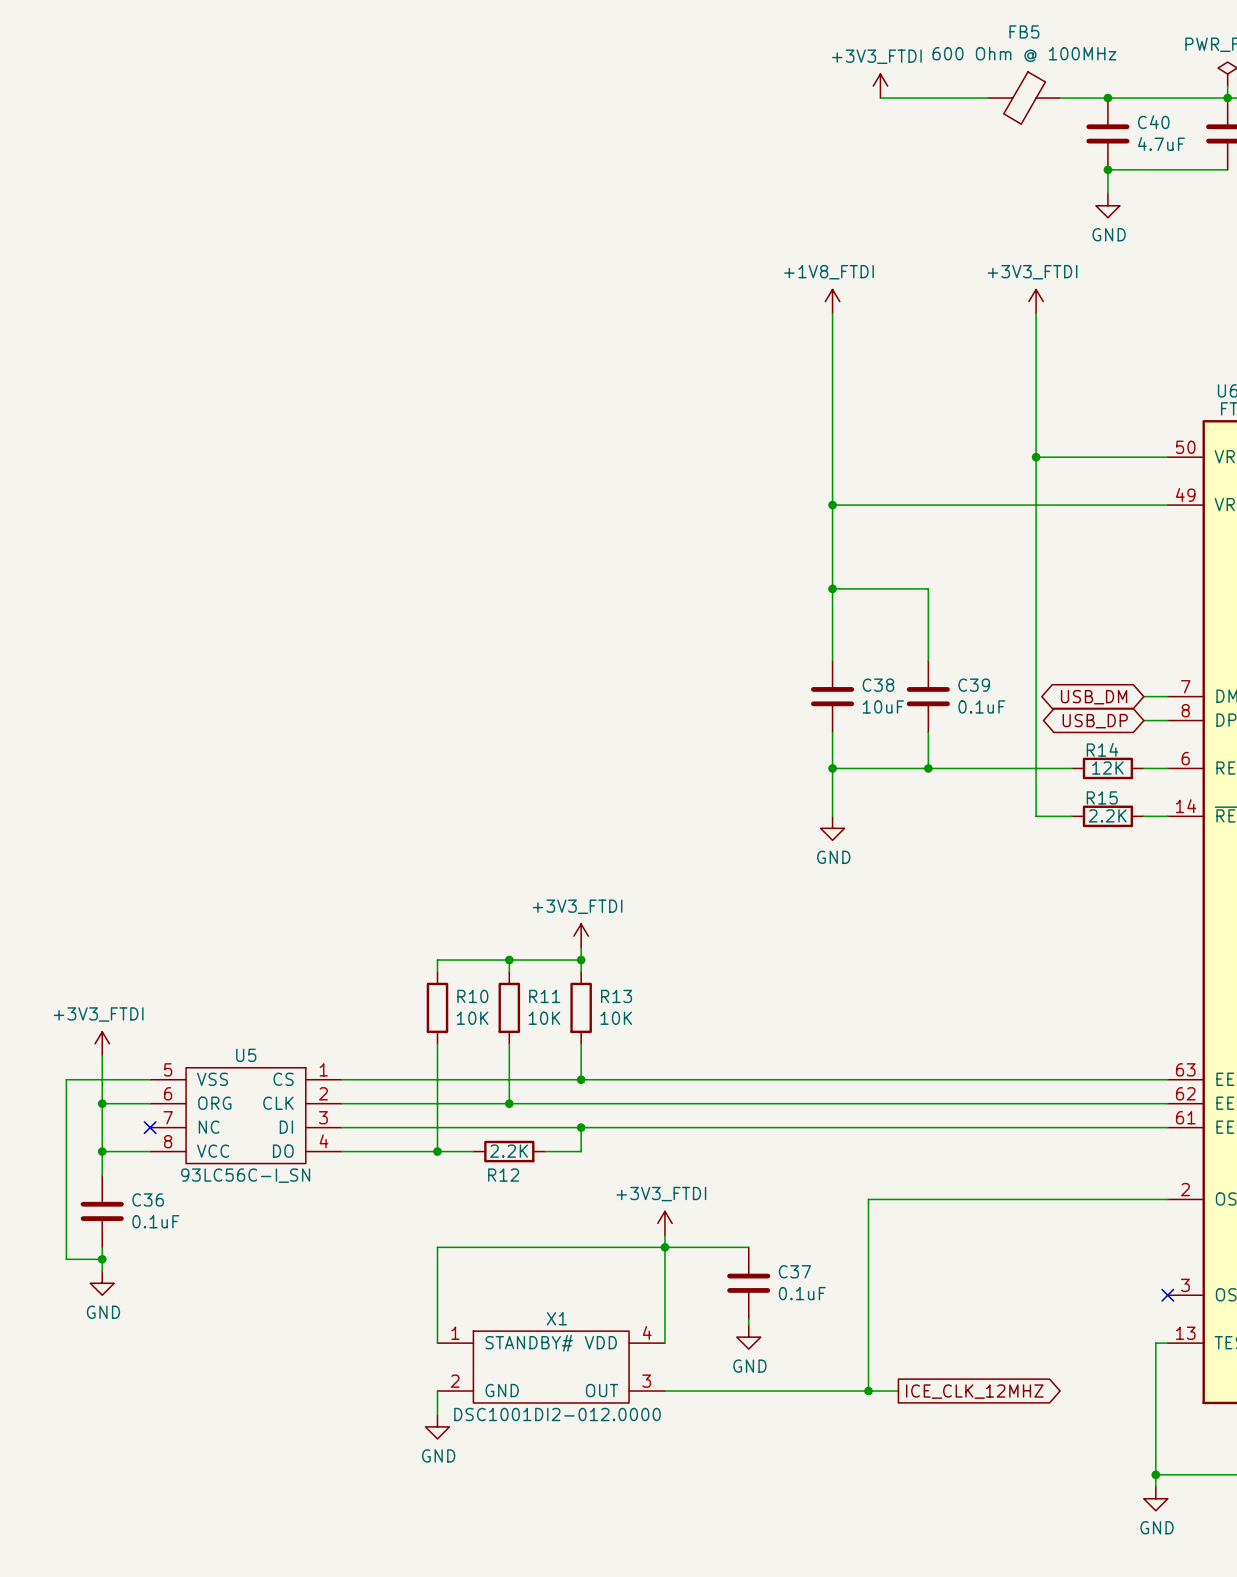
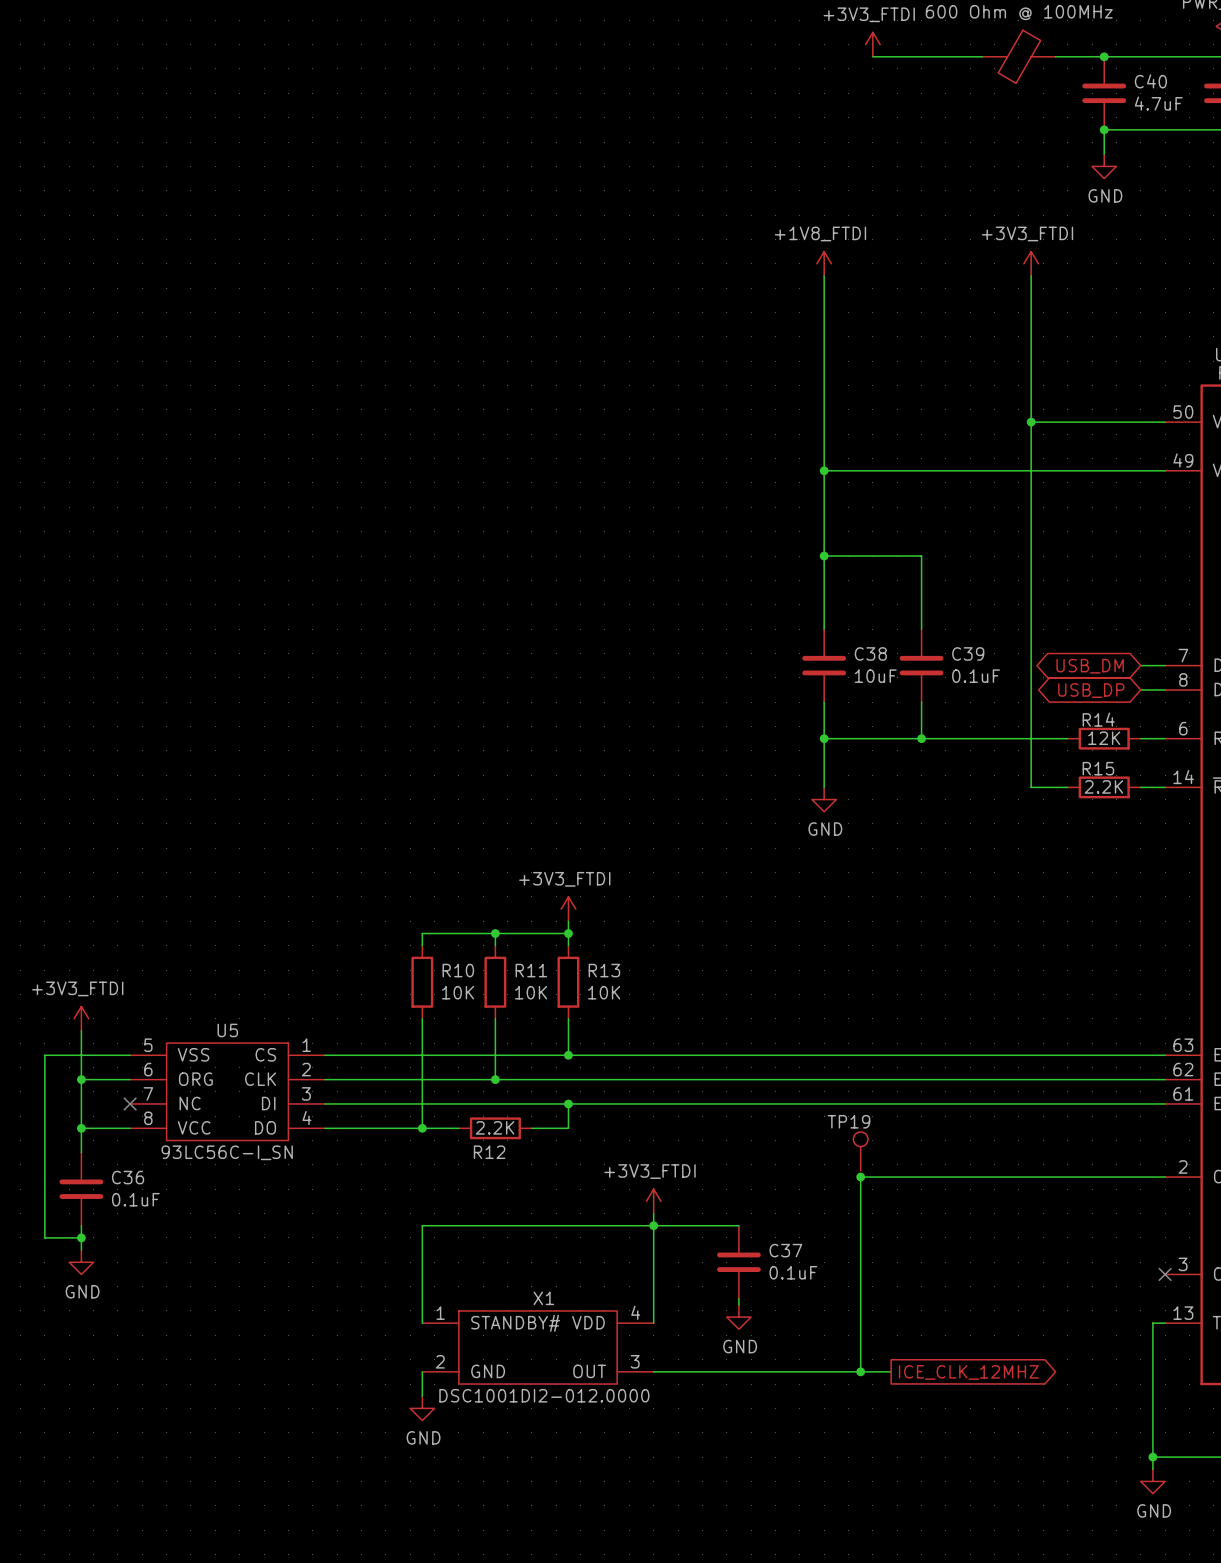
TP19: none -> (860, 1151)
junction: none -> (860, 1177)

